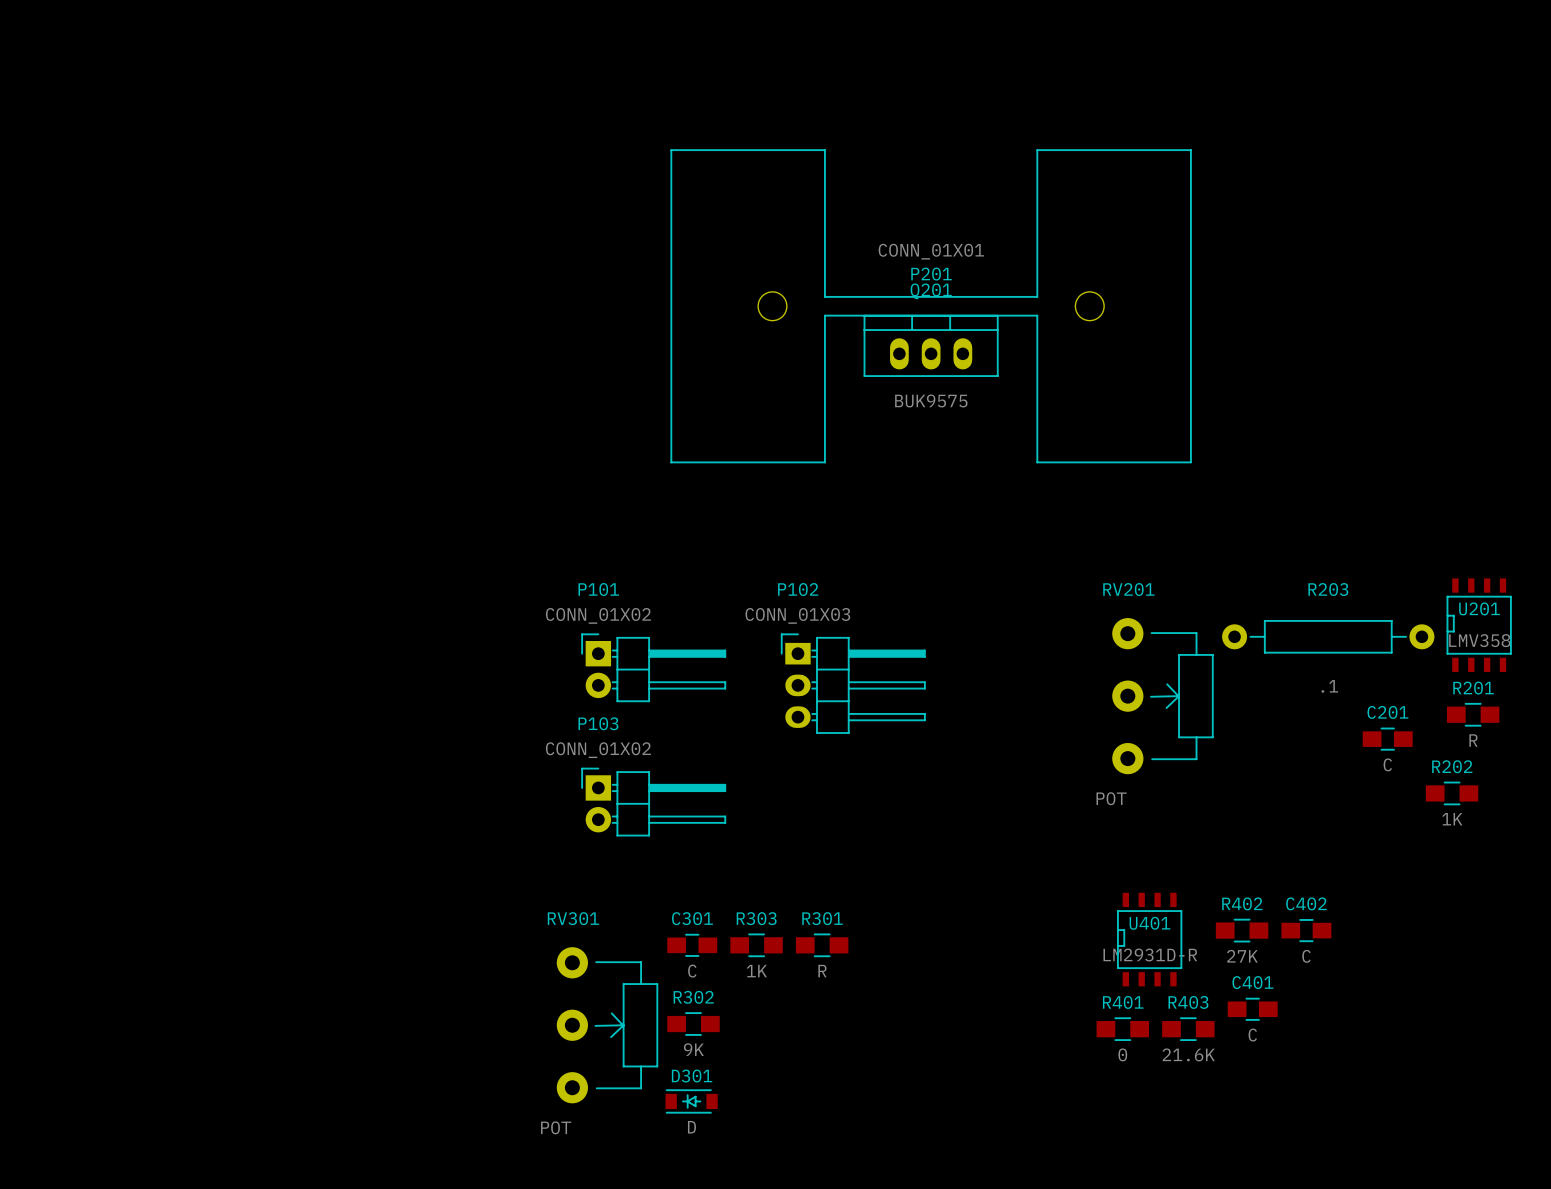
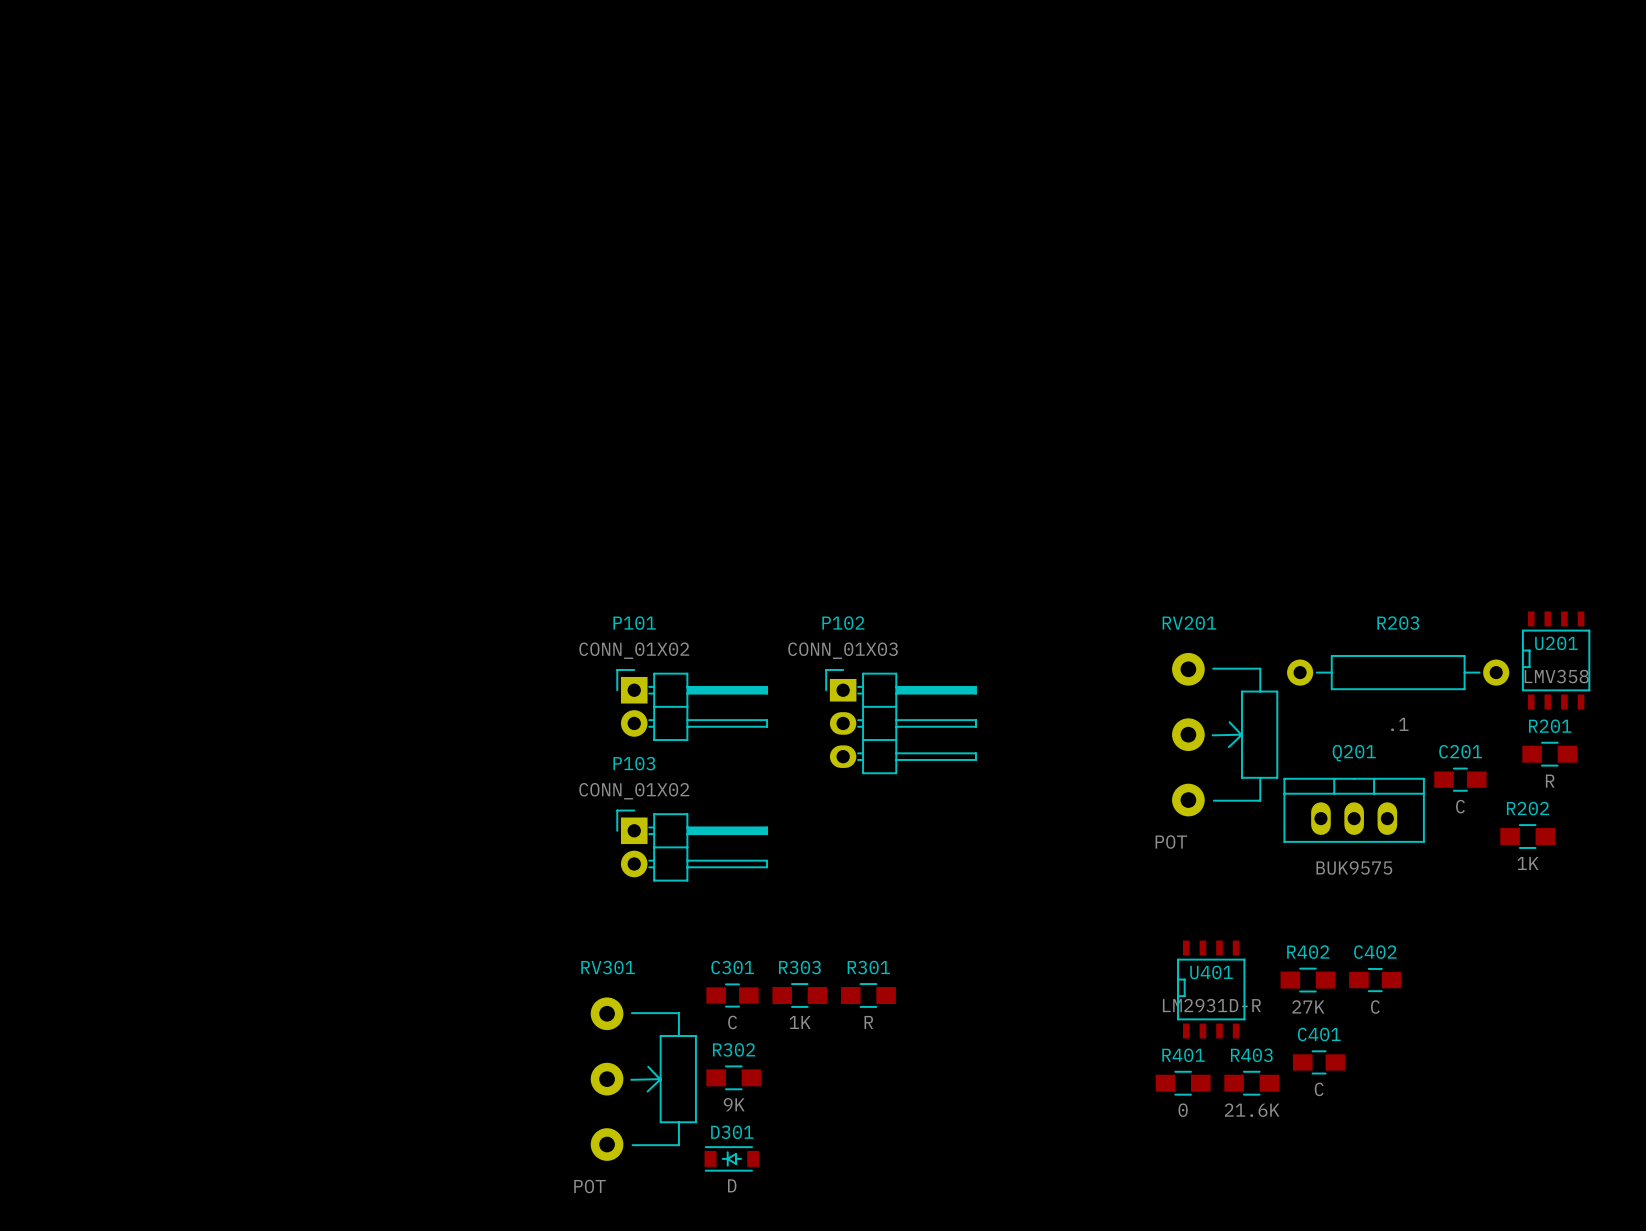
P201: CONN_01X01 (931, 306) -> none
Q201 position: (931, 345) -> (1354, 810)

